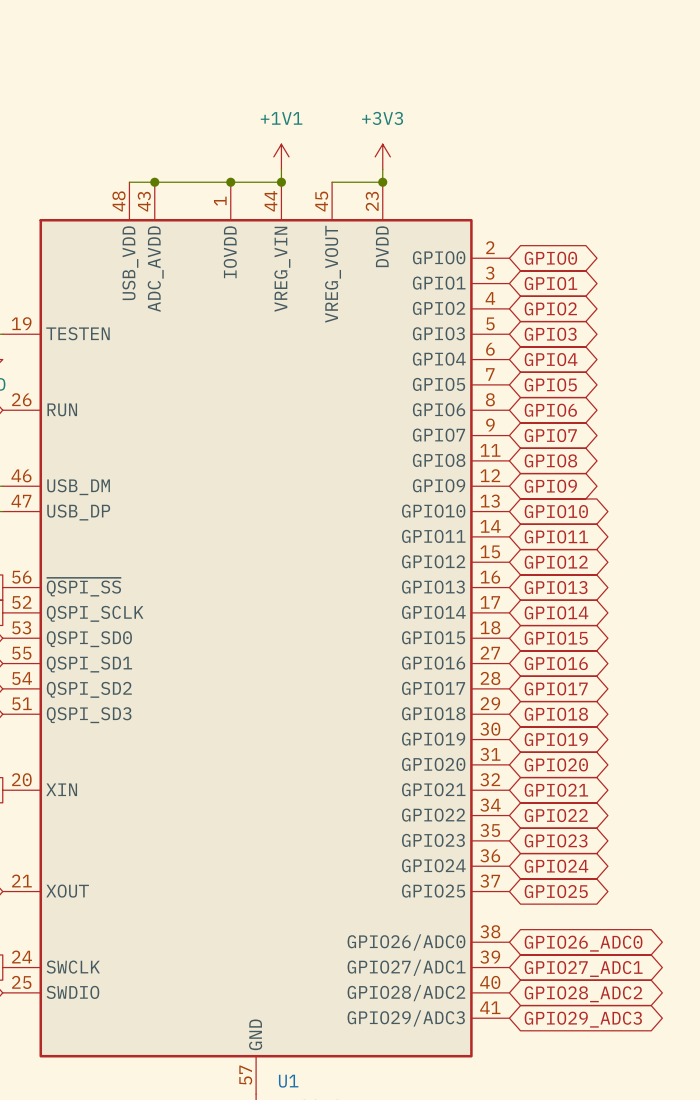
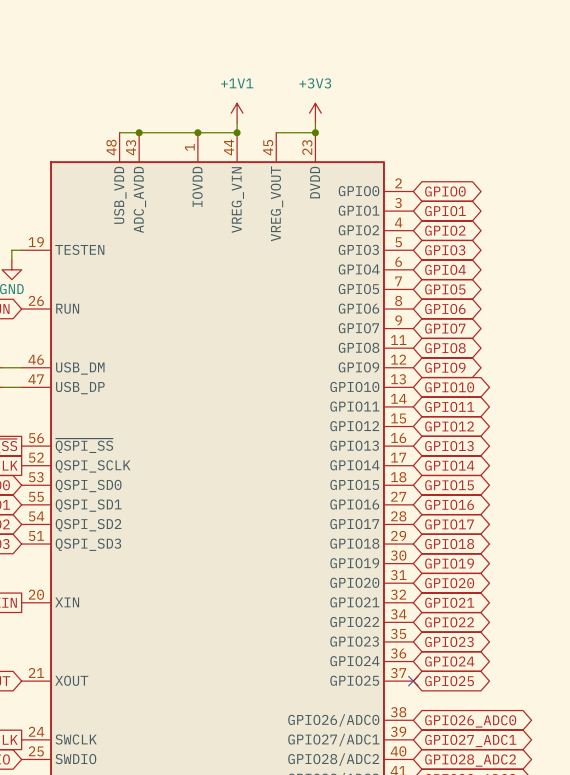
no-connect mark: none -> (413, 681)

